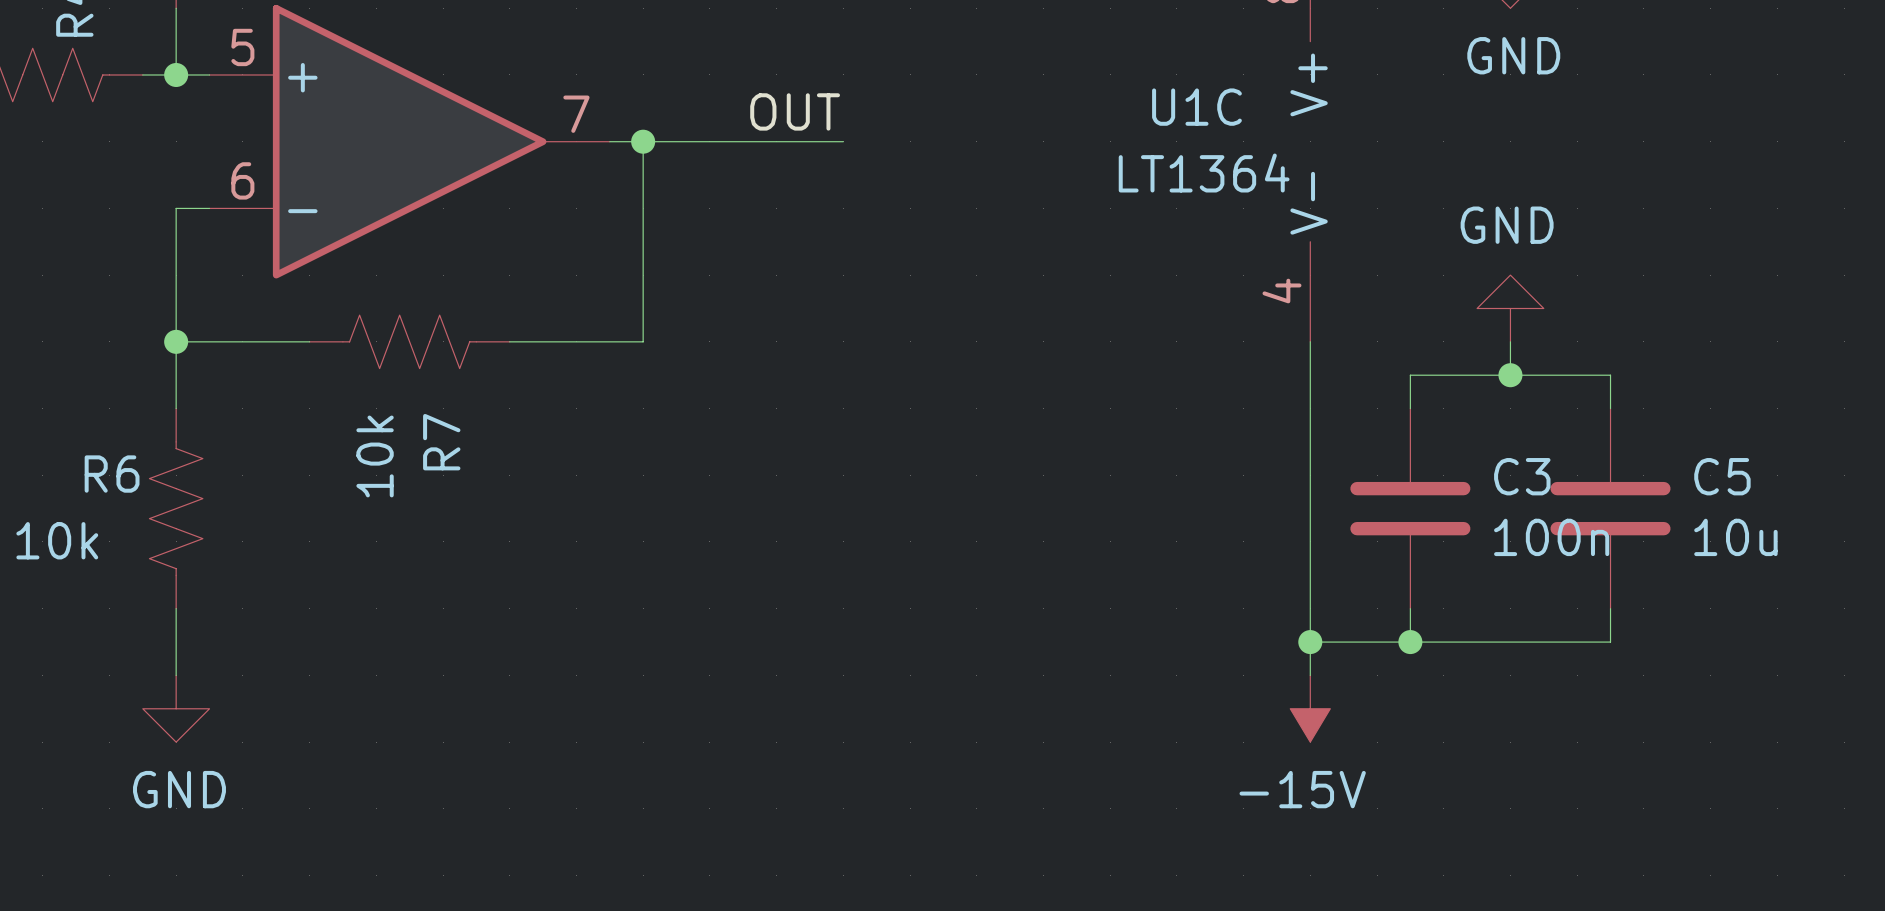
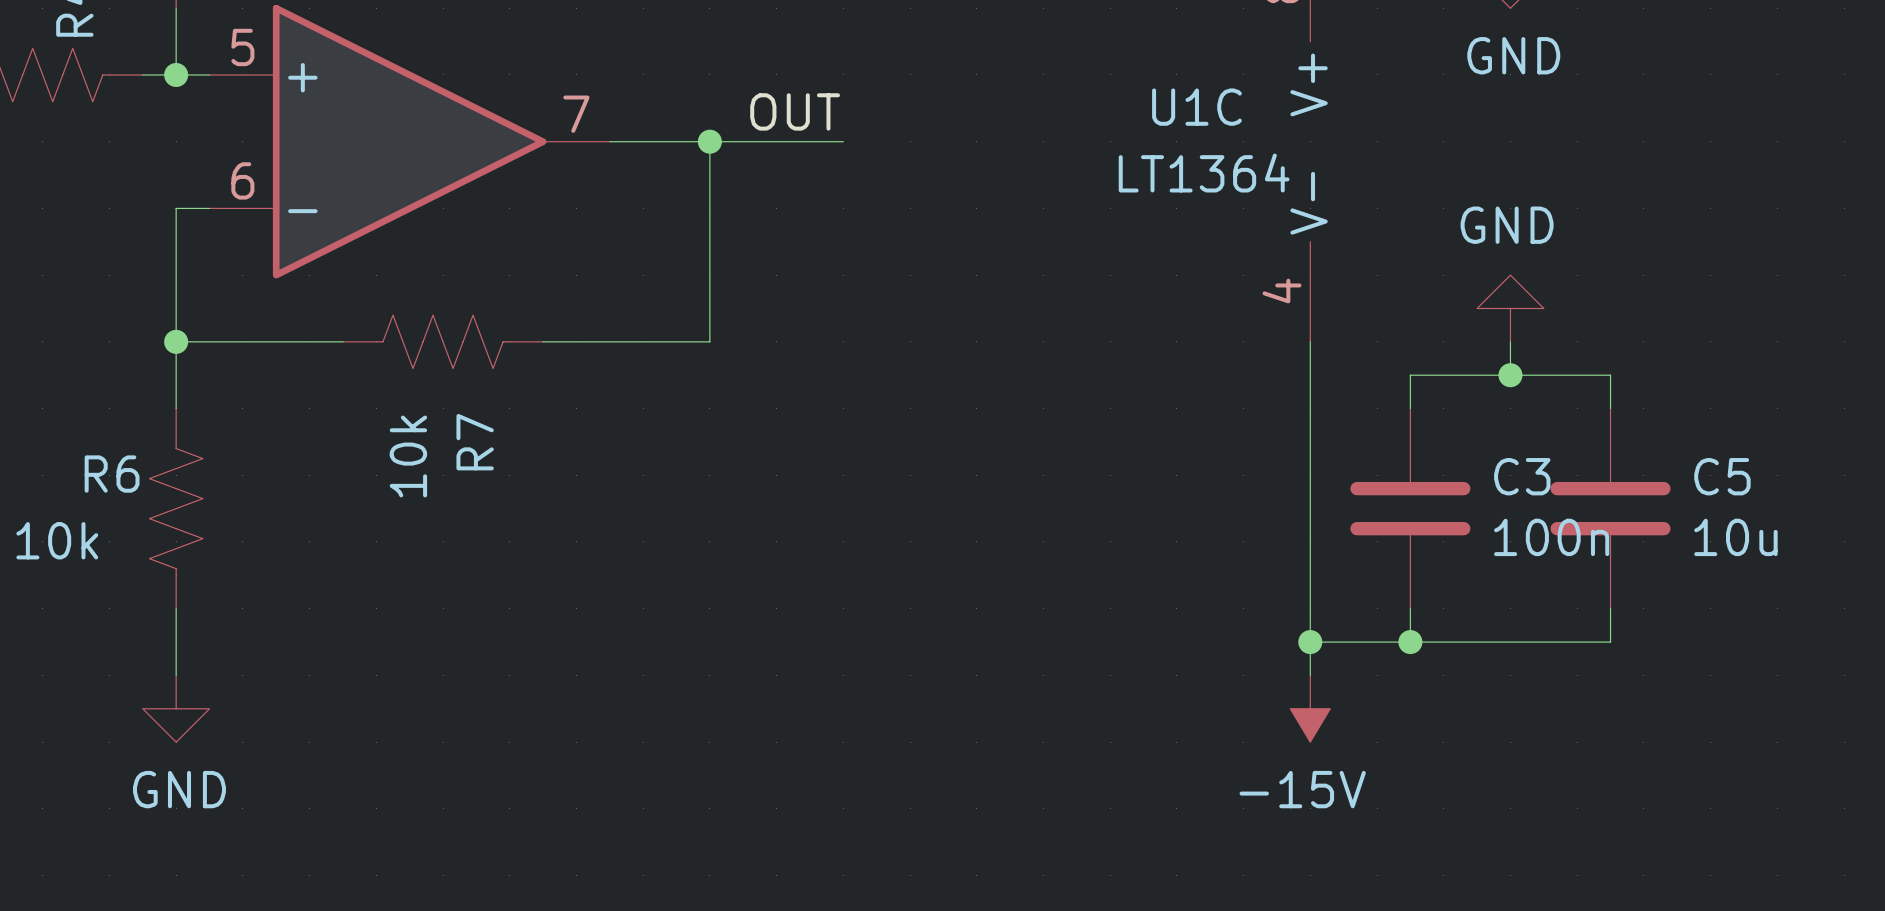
wire: (643, 141) (643, 341) -> (709, 141) (709, 341) (643, 341)
junction position: (643, 141) -> (709, 141)
R7 position: (409, 341) -> (443, 341)

